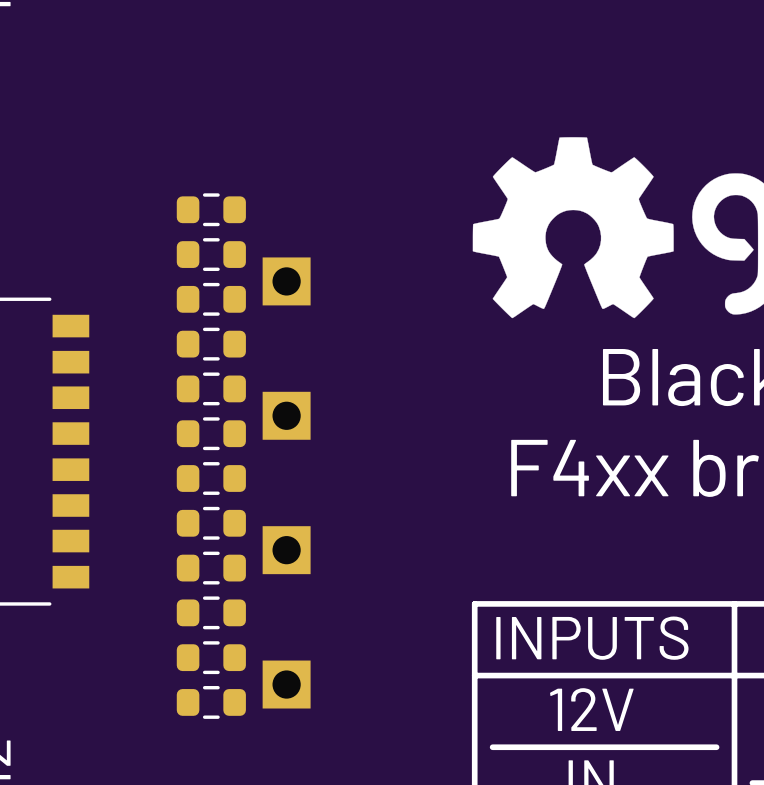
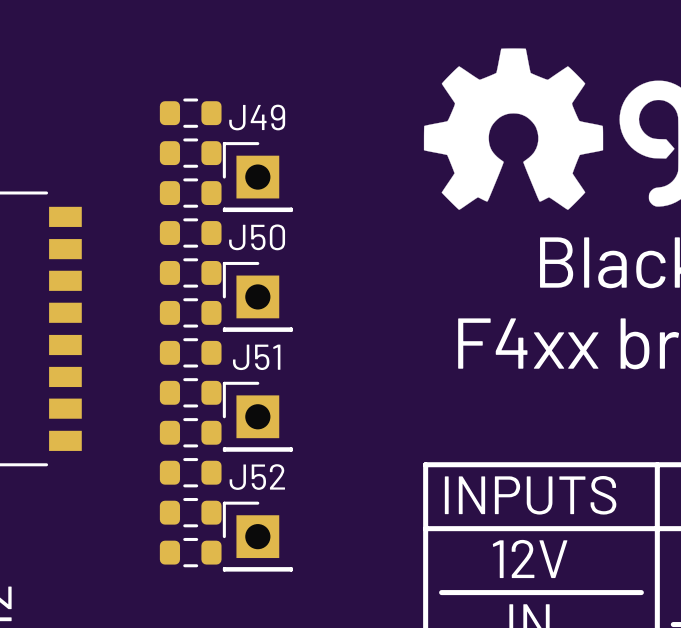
J49: none -> (257, 177)
J50: none -> (257, 296)
J51: none -> (257, 416)
J52: none -> (257, 536)

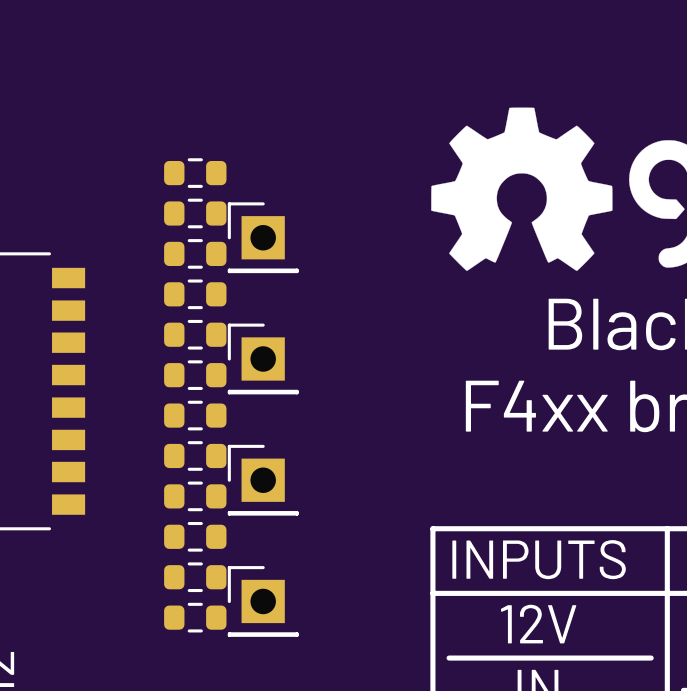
J49 name: J49 (257, 117) -> none
J50 name: J50 (257, 237) -> none
J51 name: J51 (256, 357) -> none
J52 name: J52 (257, 477) -> none

